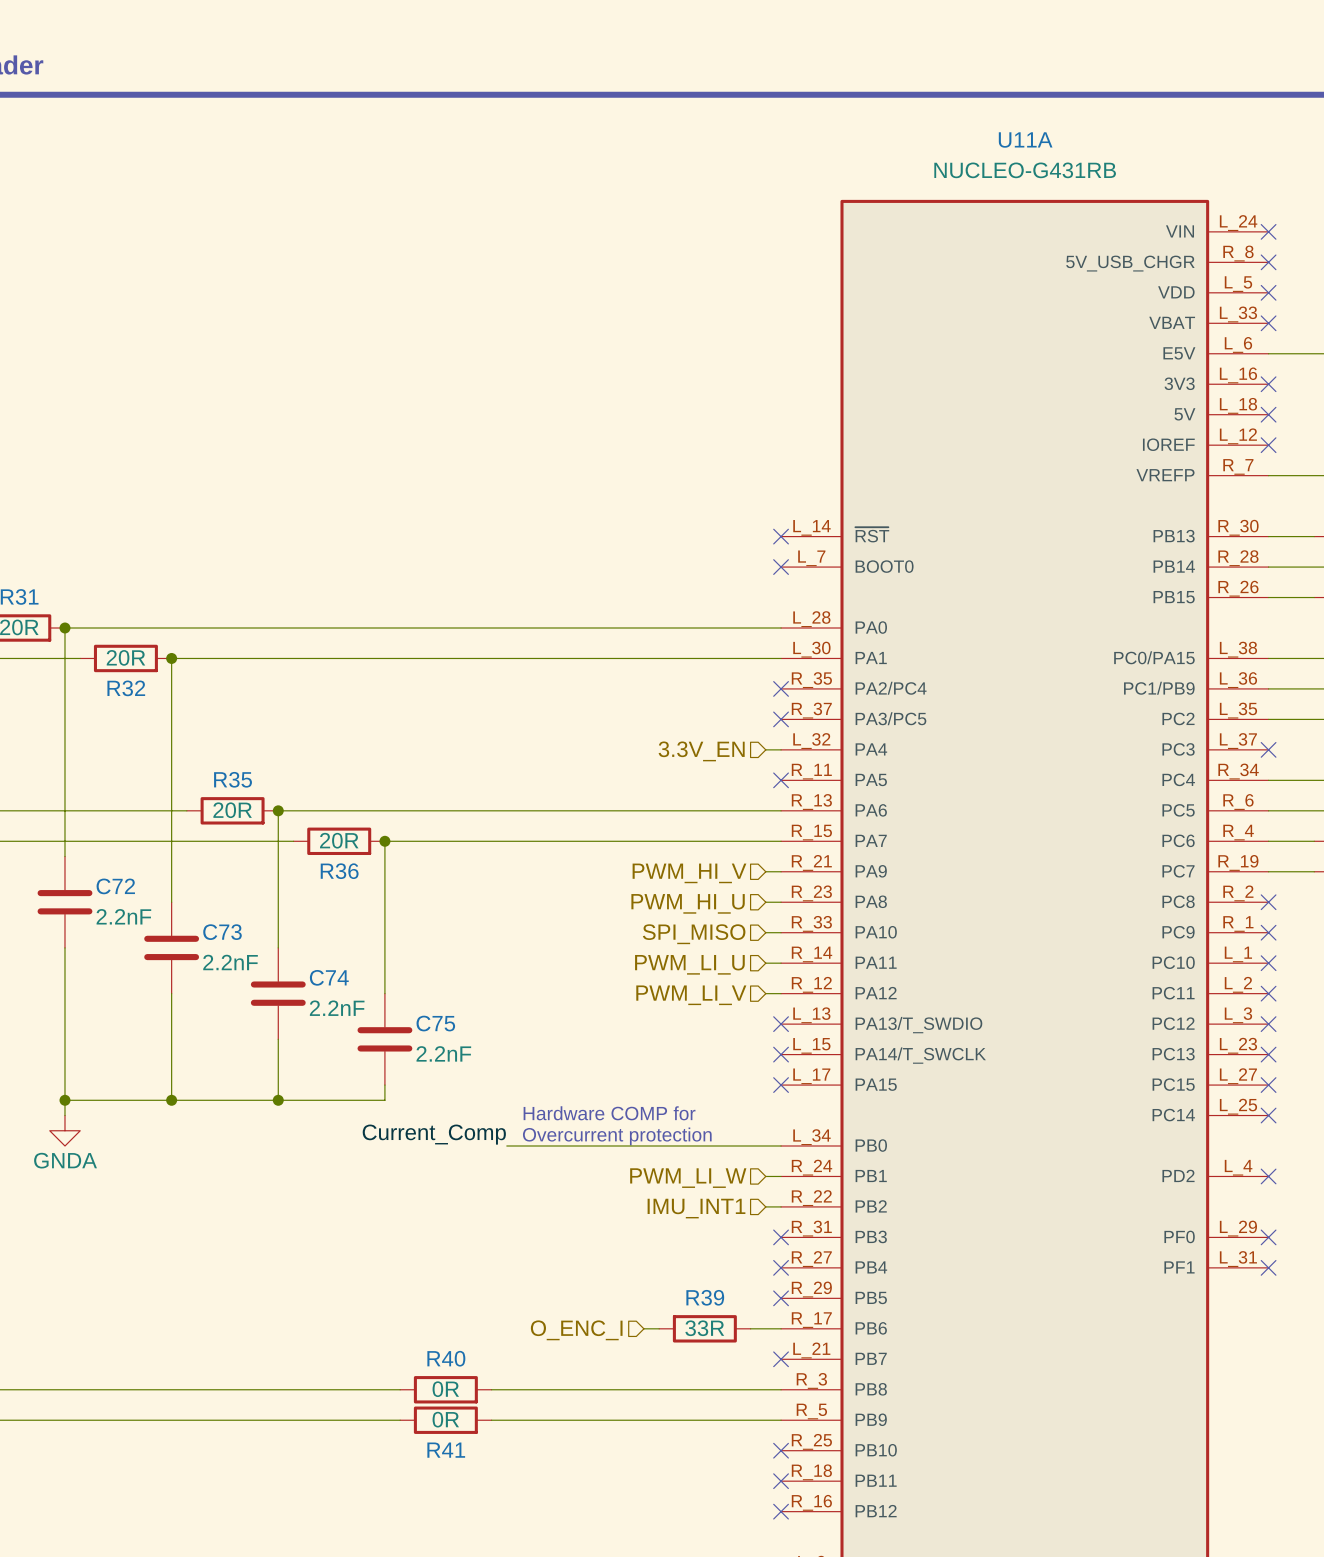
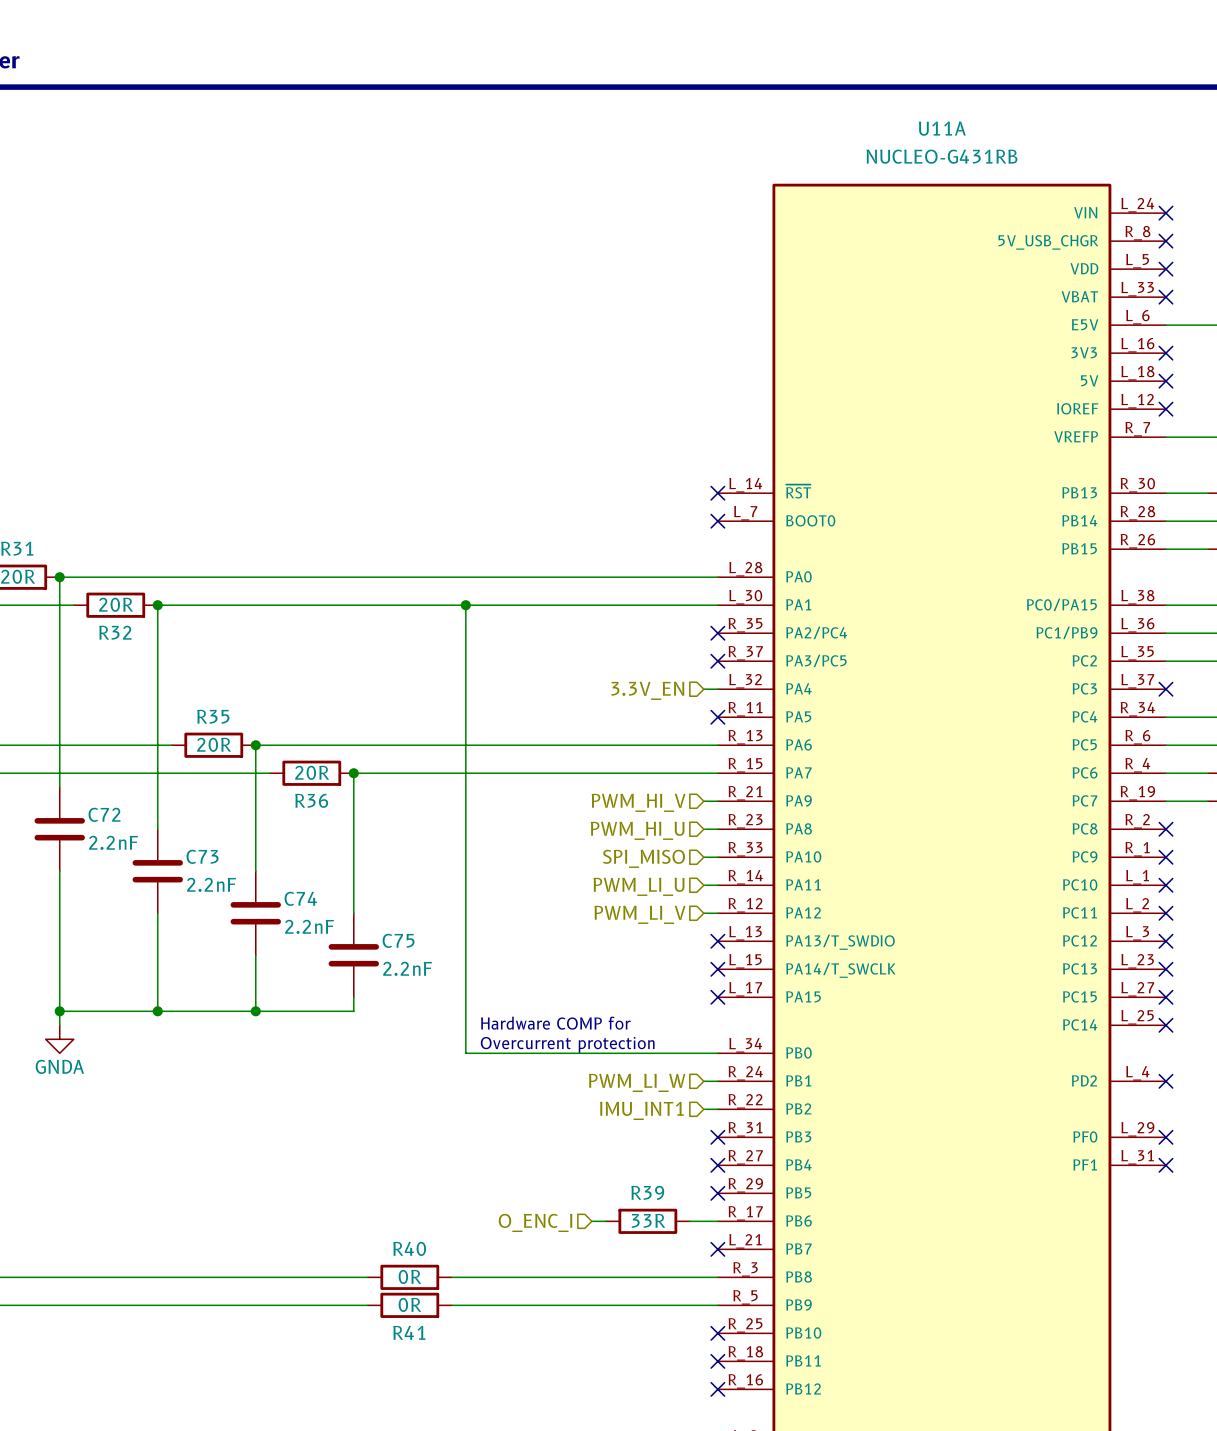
wire: none -> (465, 605) (465, 1053)
junction: none -> (465, 605)
label: Current_Comp (434, 1134) -> none

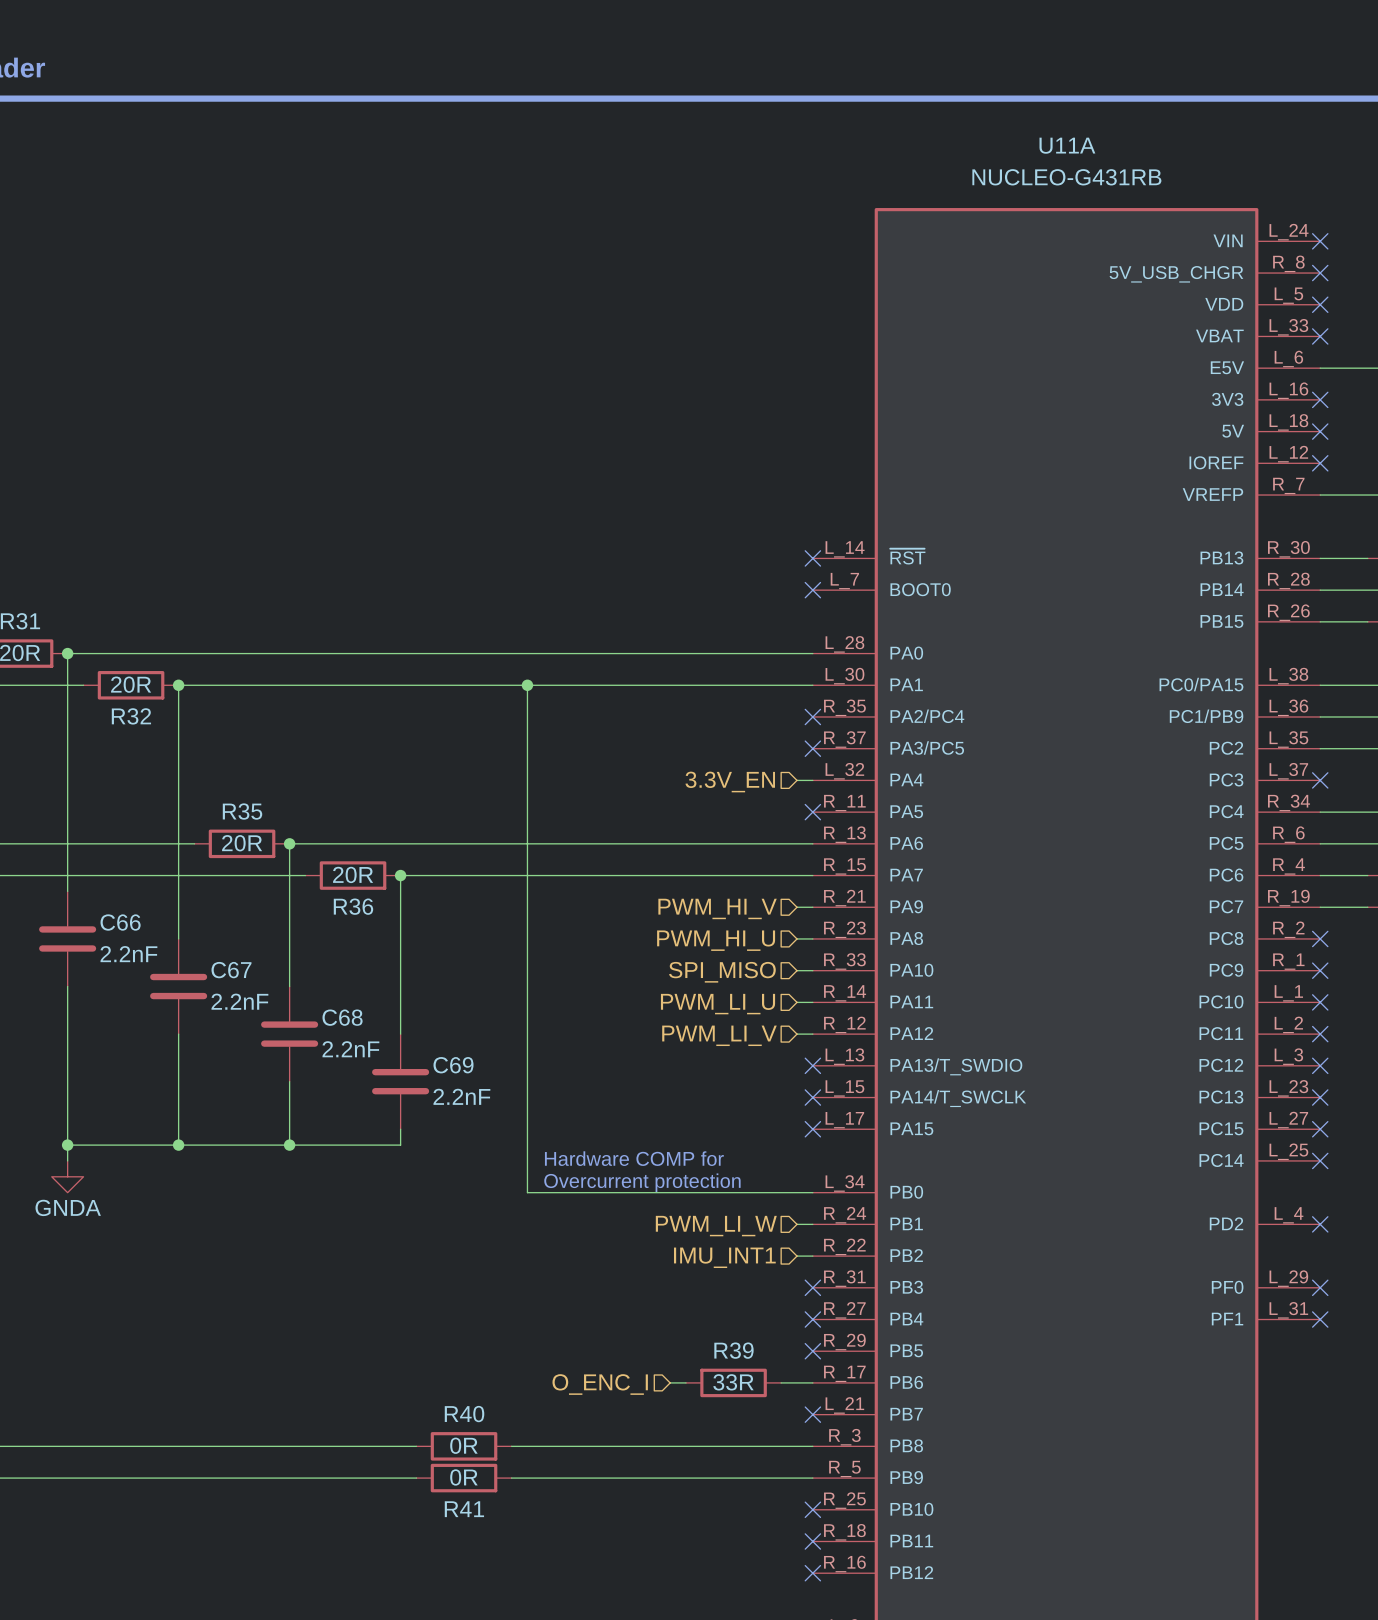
C72 name: C72 (104, 814) -> C66 (120, 922)
C73 name: C73 (202, 856) -> C67 (231, 970)
C74 name: C74 (300, 898) -> C68 (342, 1017)
C75 name: C75 (398, 940) -> C69 (453, 1065)

